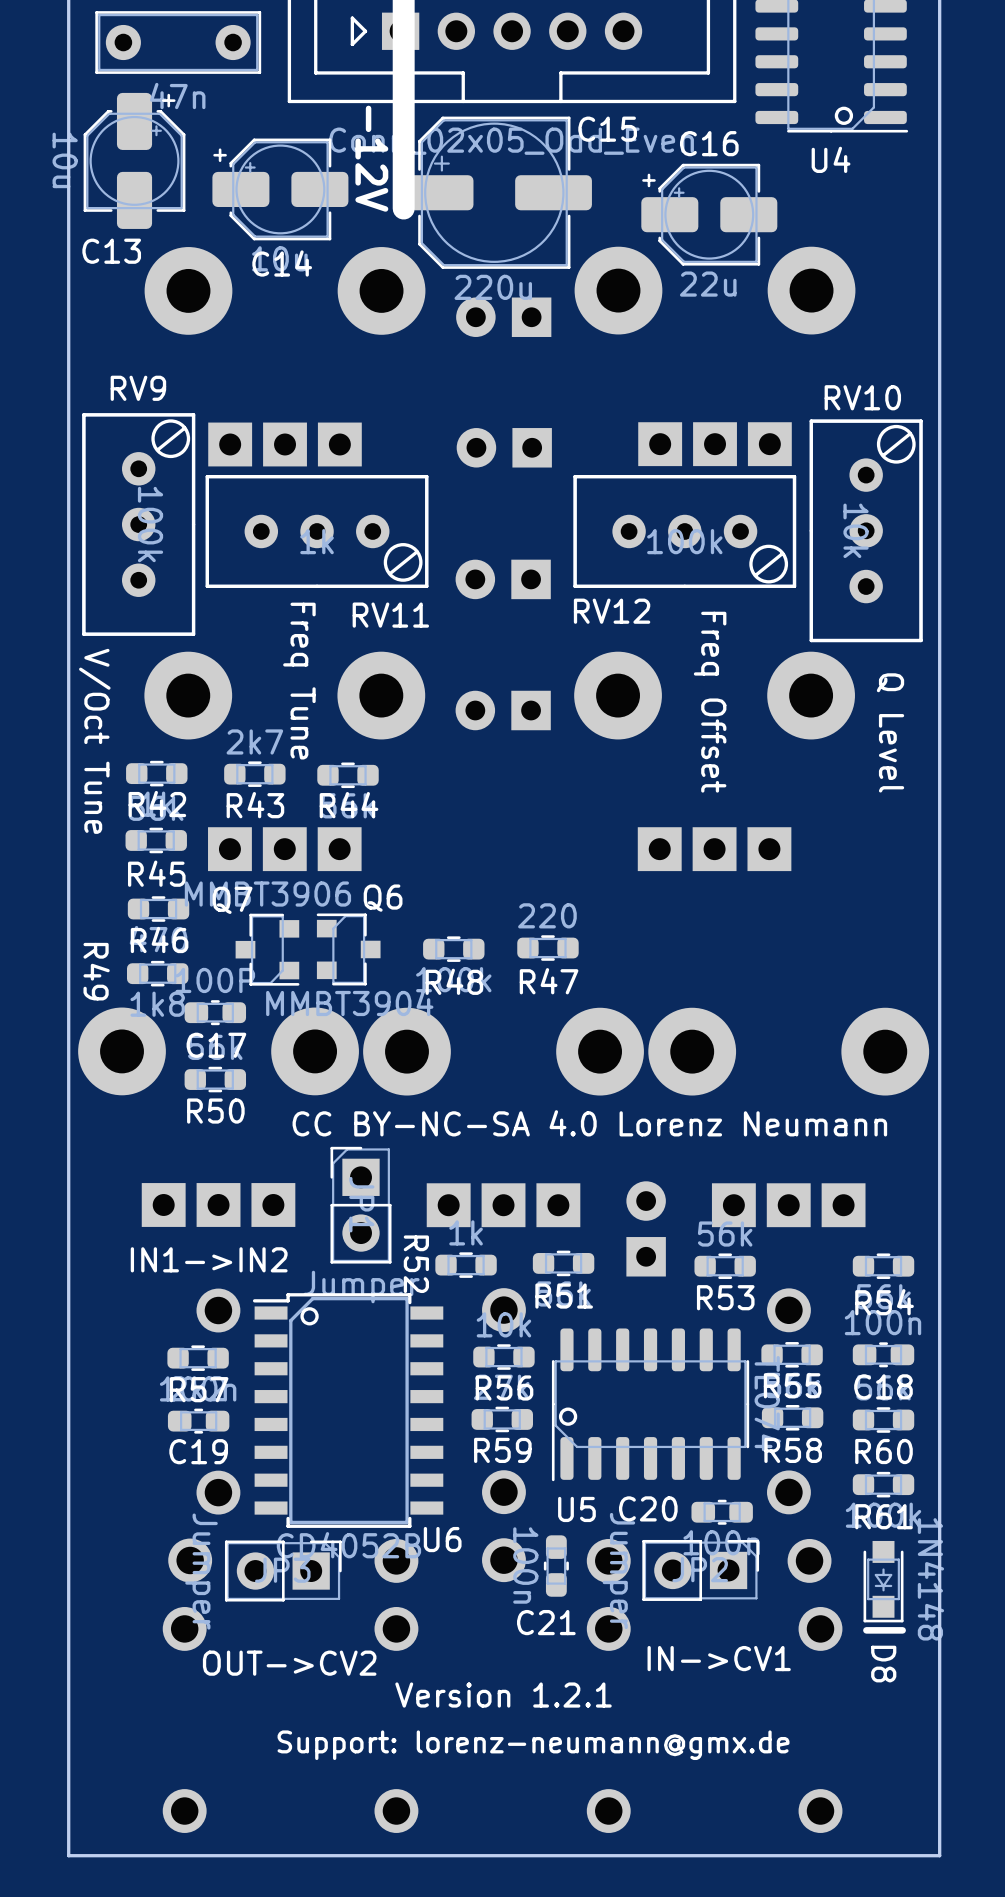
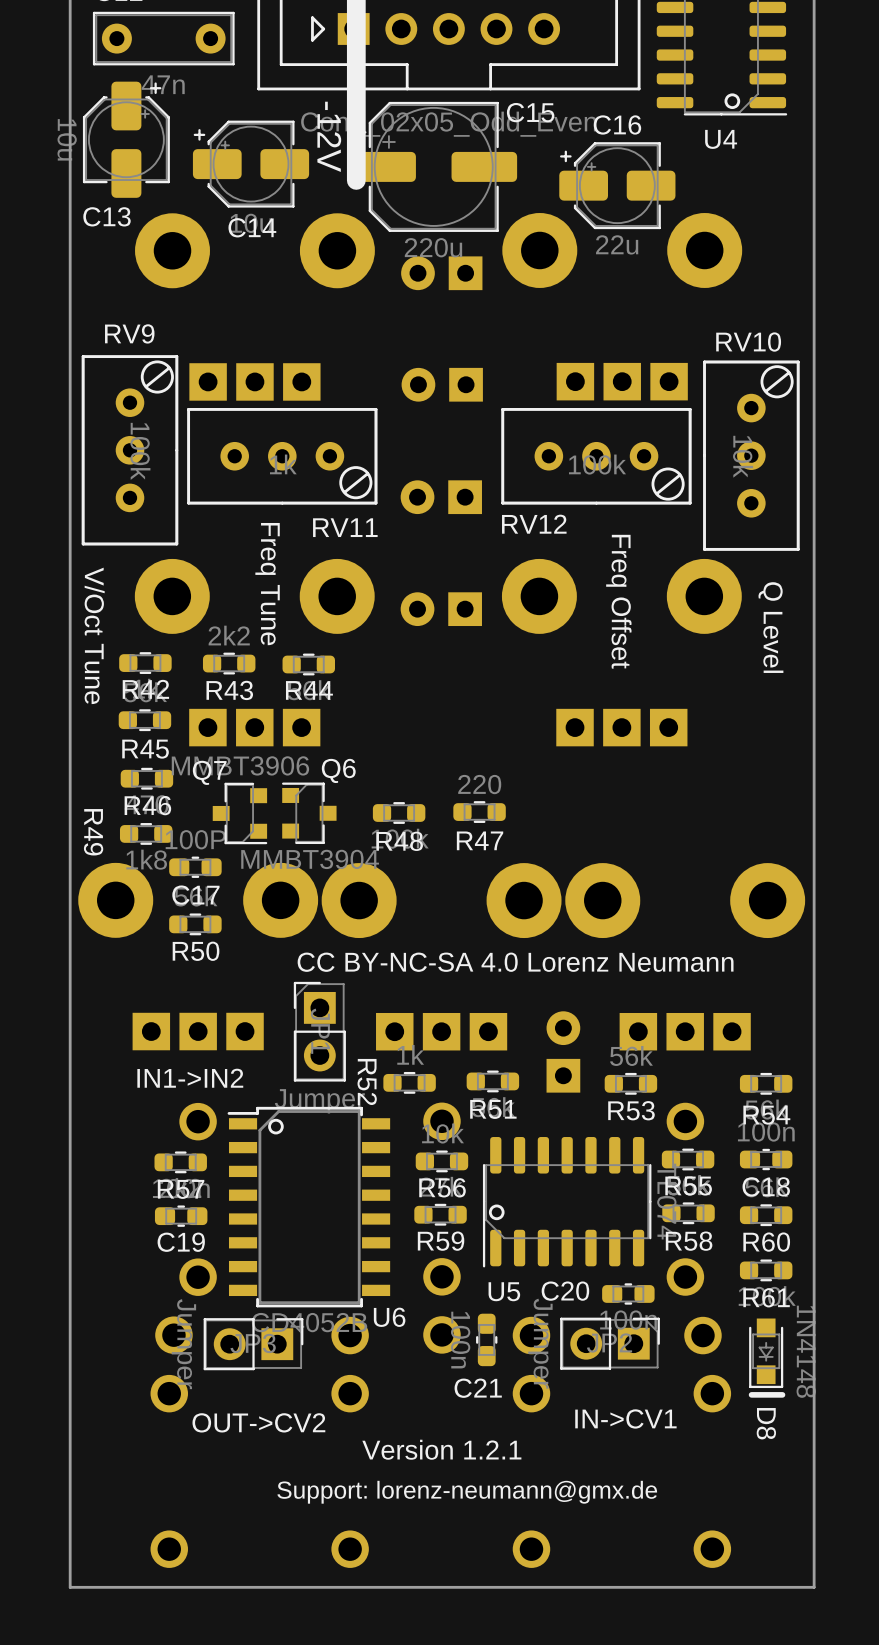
R43 value: 2k7 (254, 741) -> 2k2 (229, 635)

